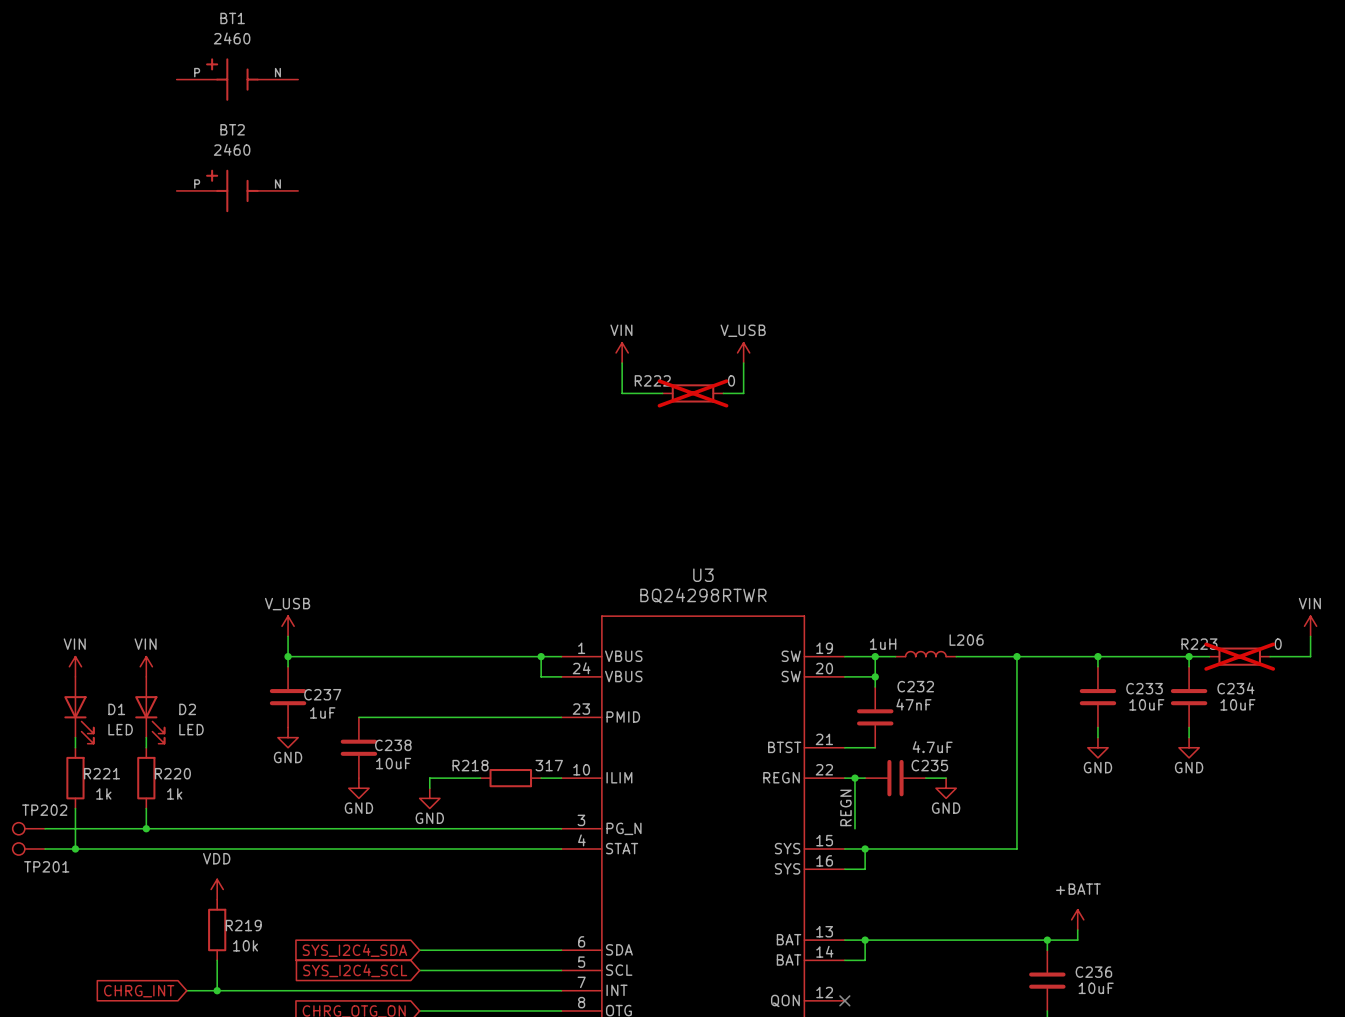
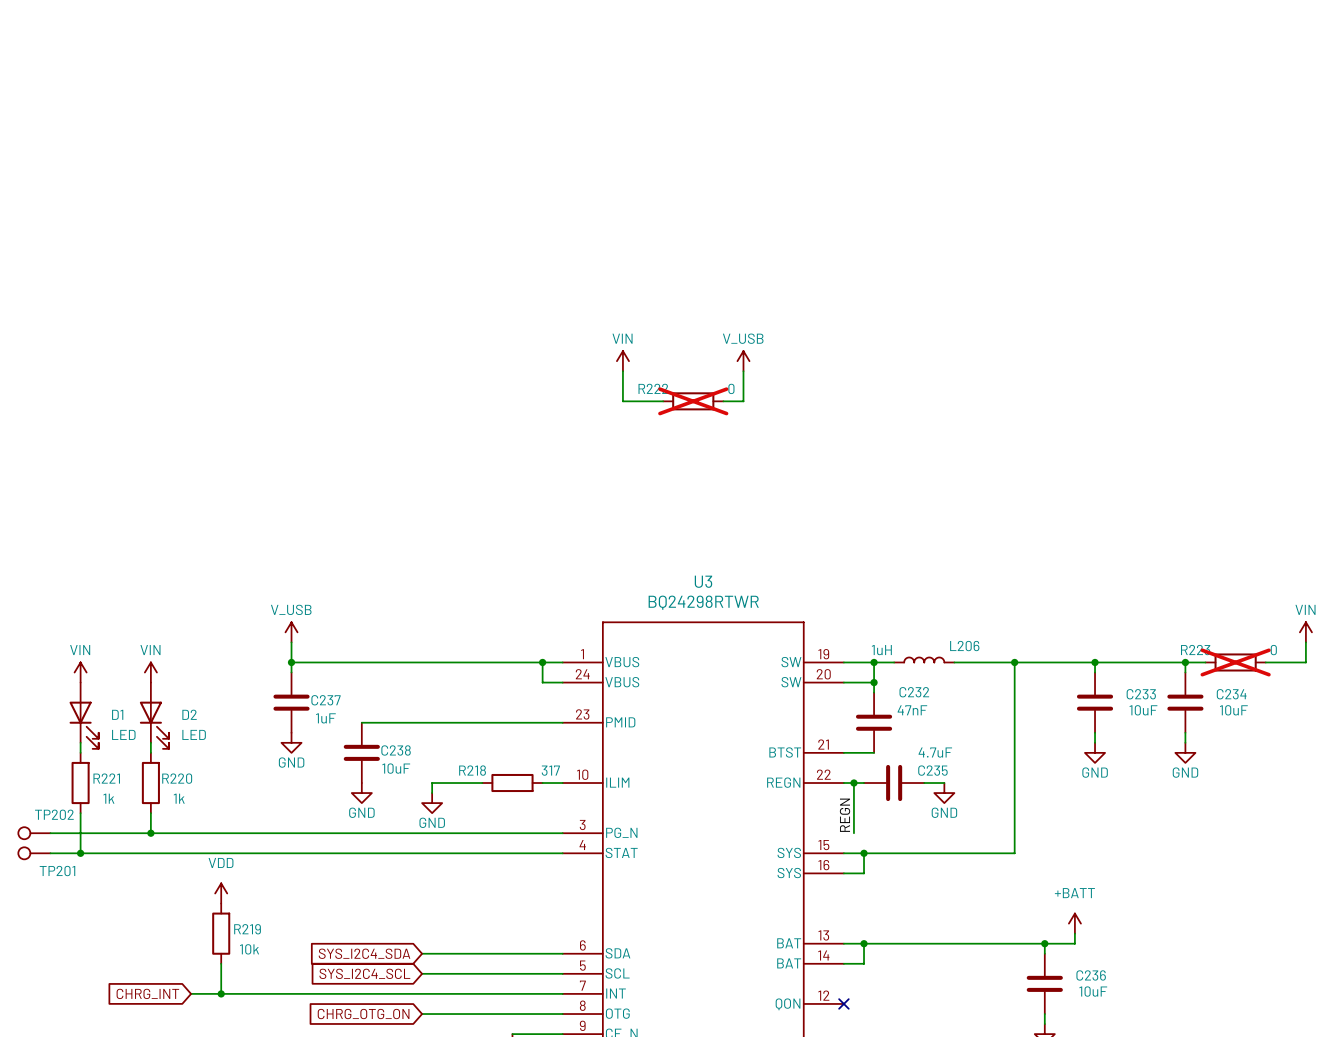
BT1: 2460 (237, 79) -> none
BT2: 2460 (237, 190) -> none

